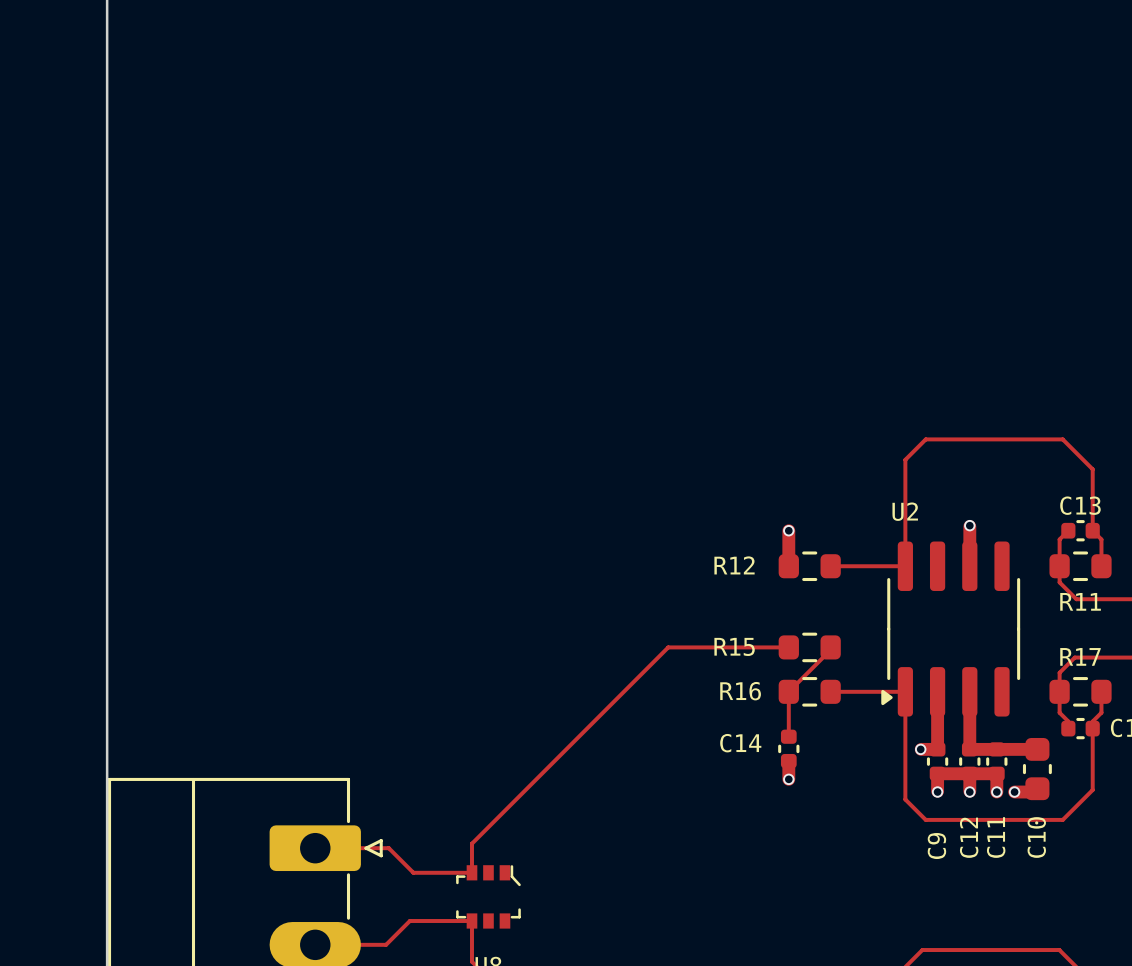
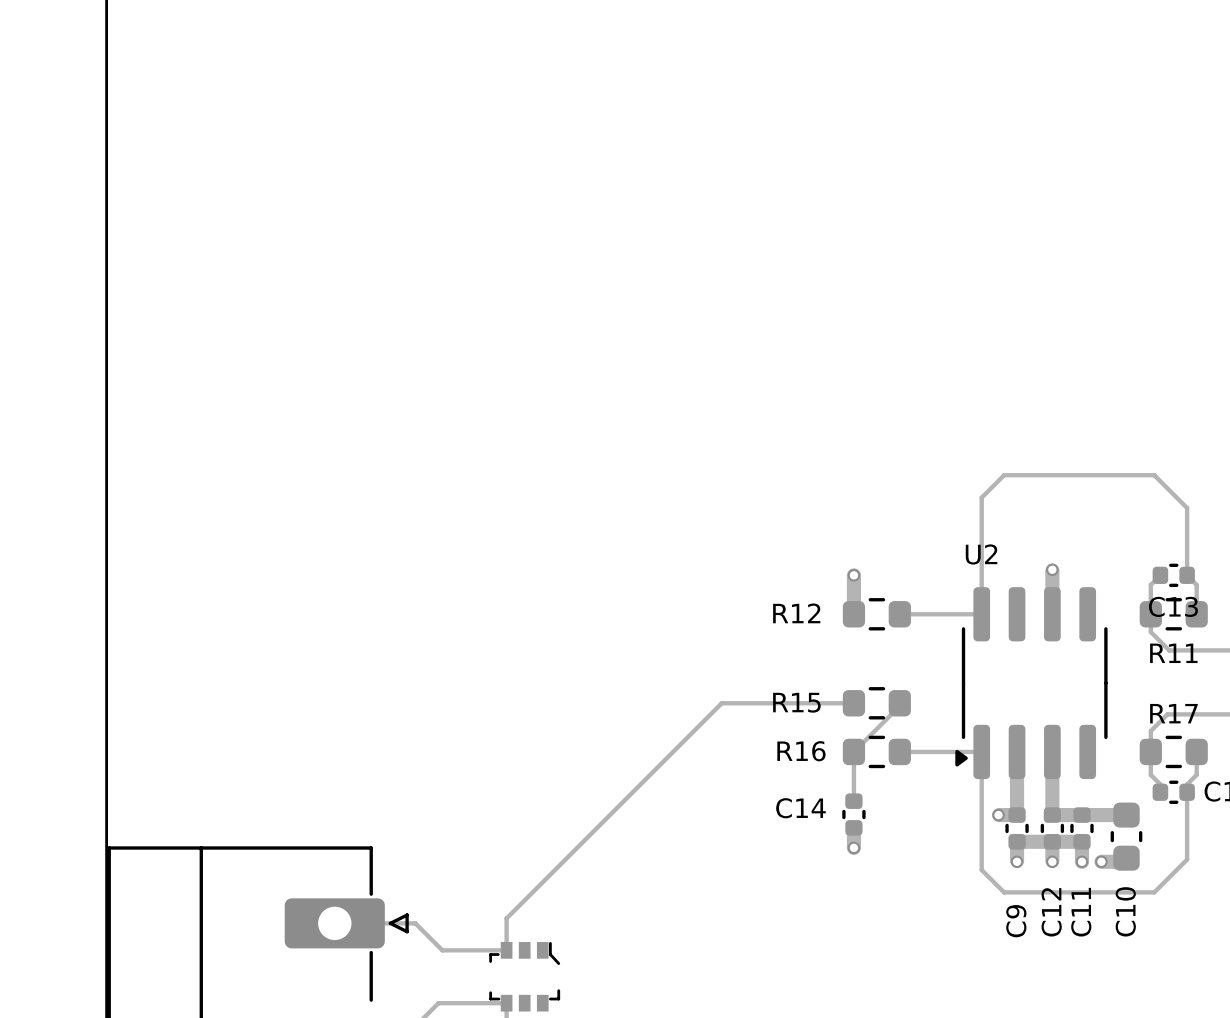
C13 name position: C13 (1080, 505) -> C13 (1173, 606)

